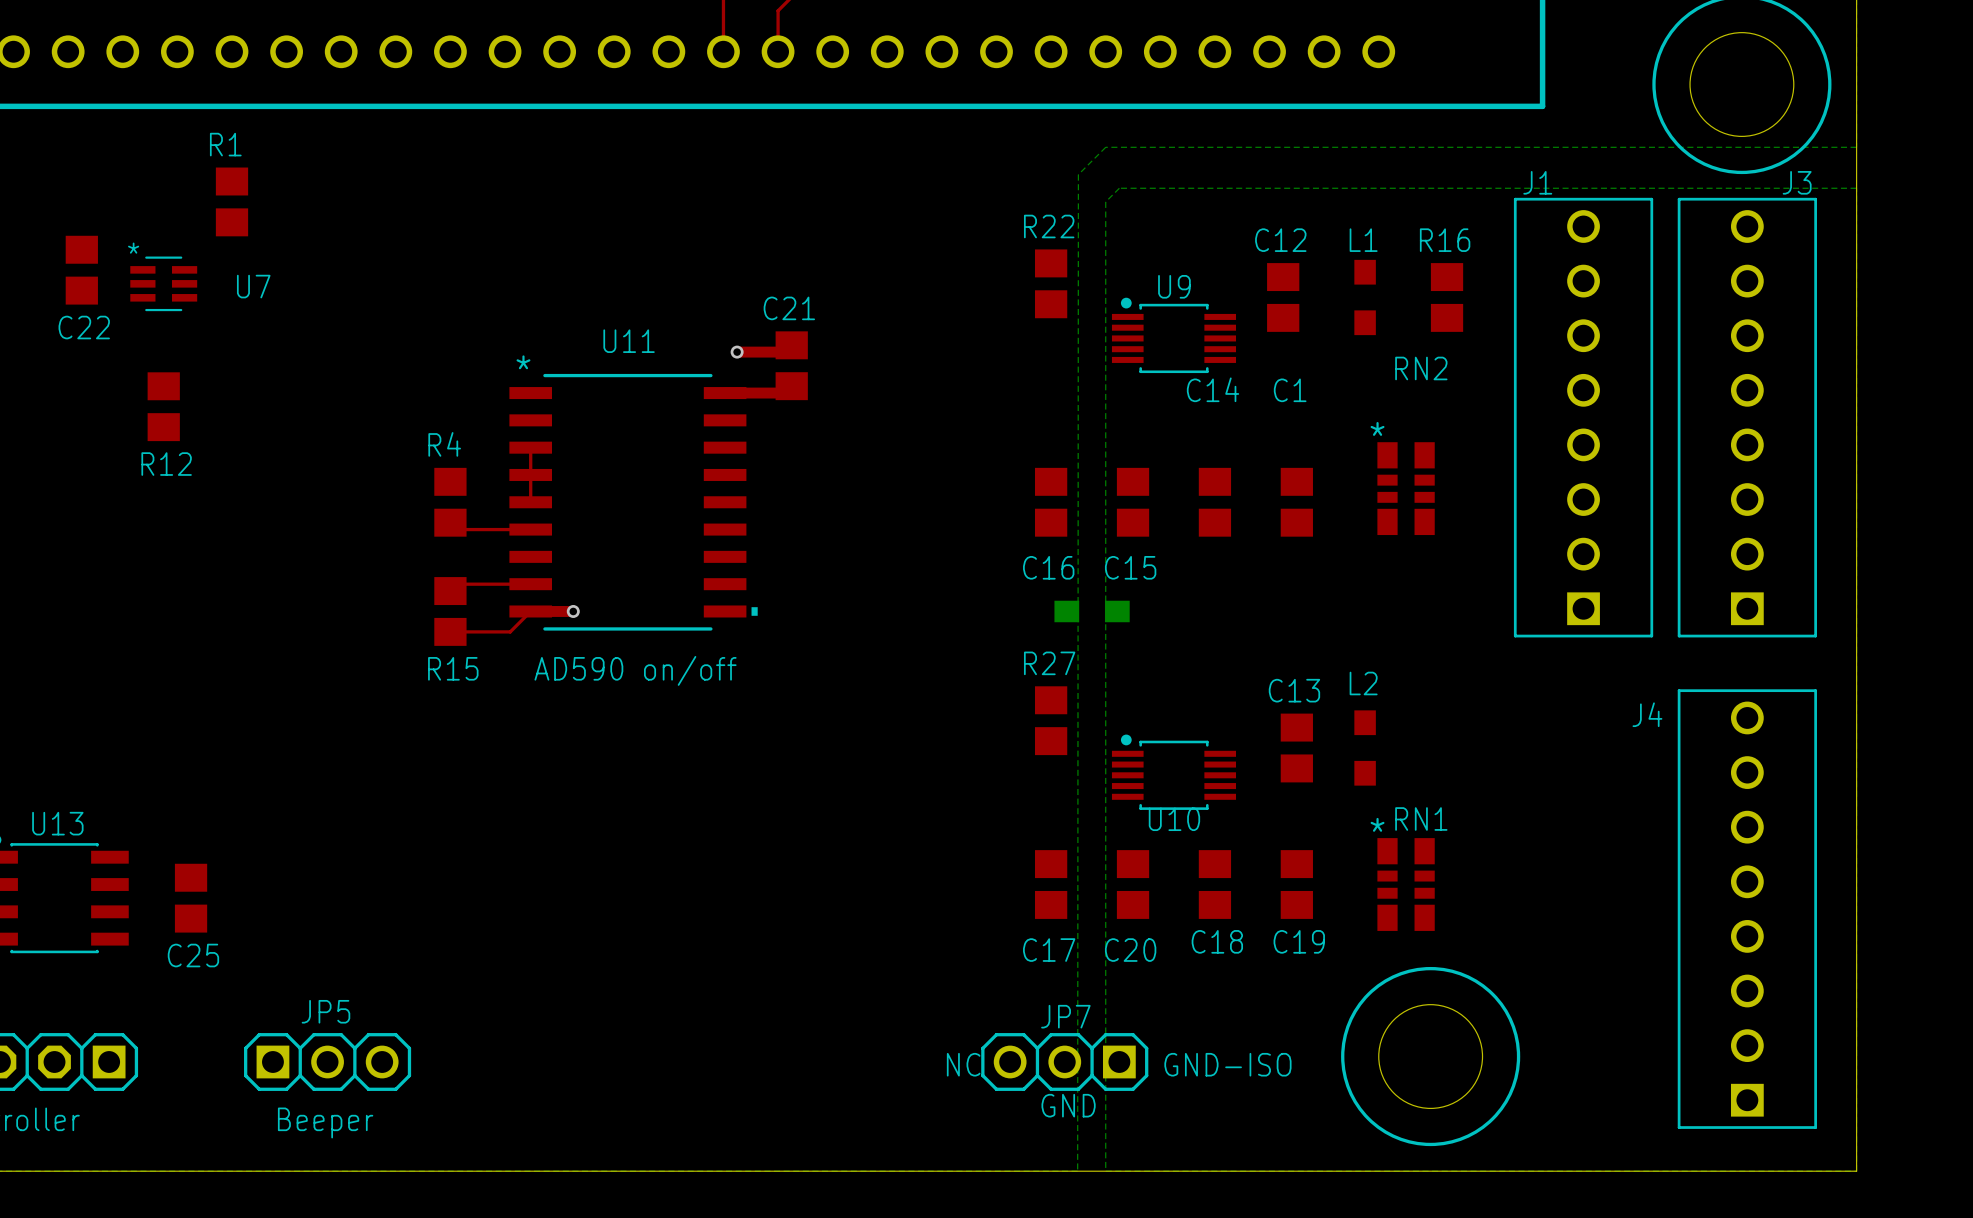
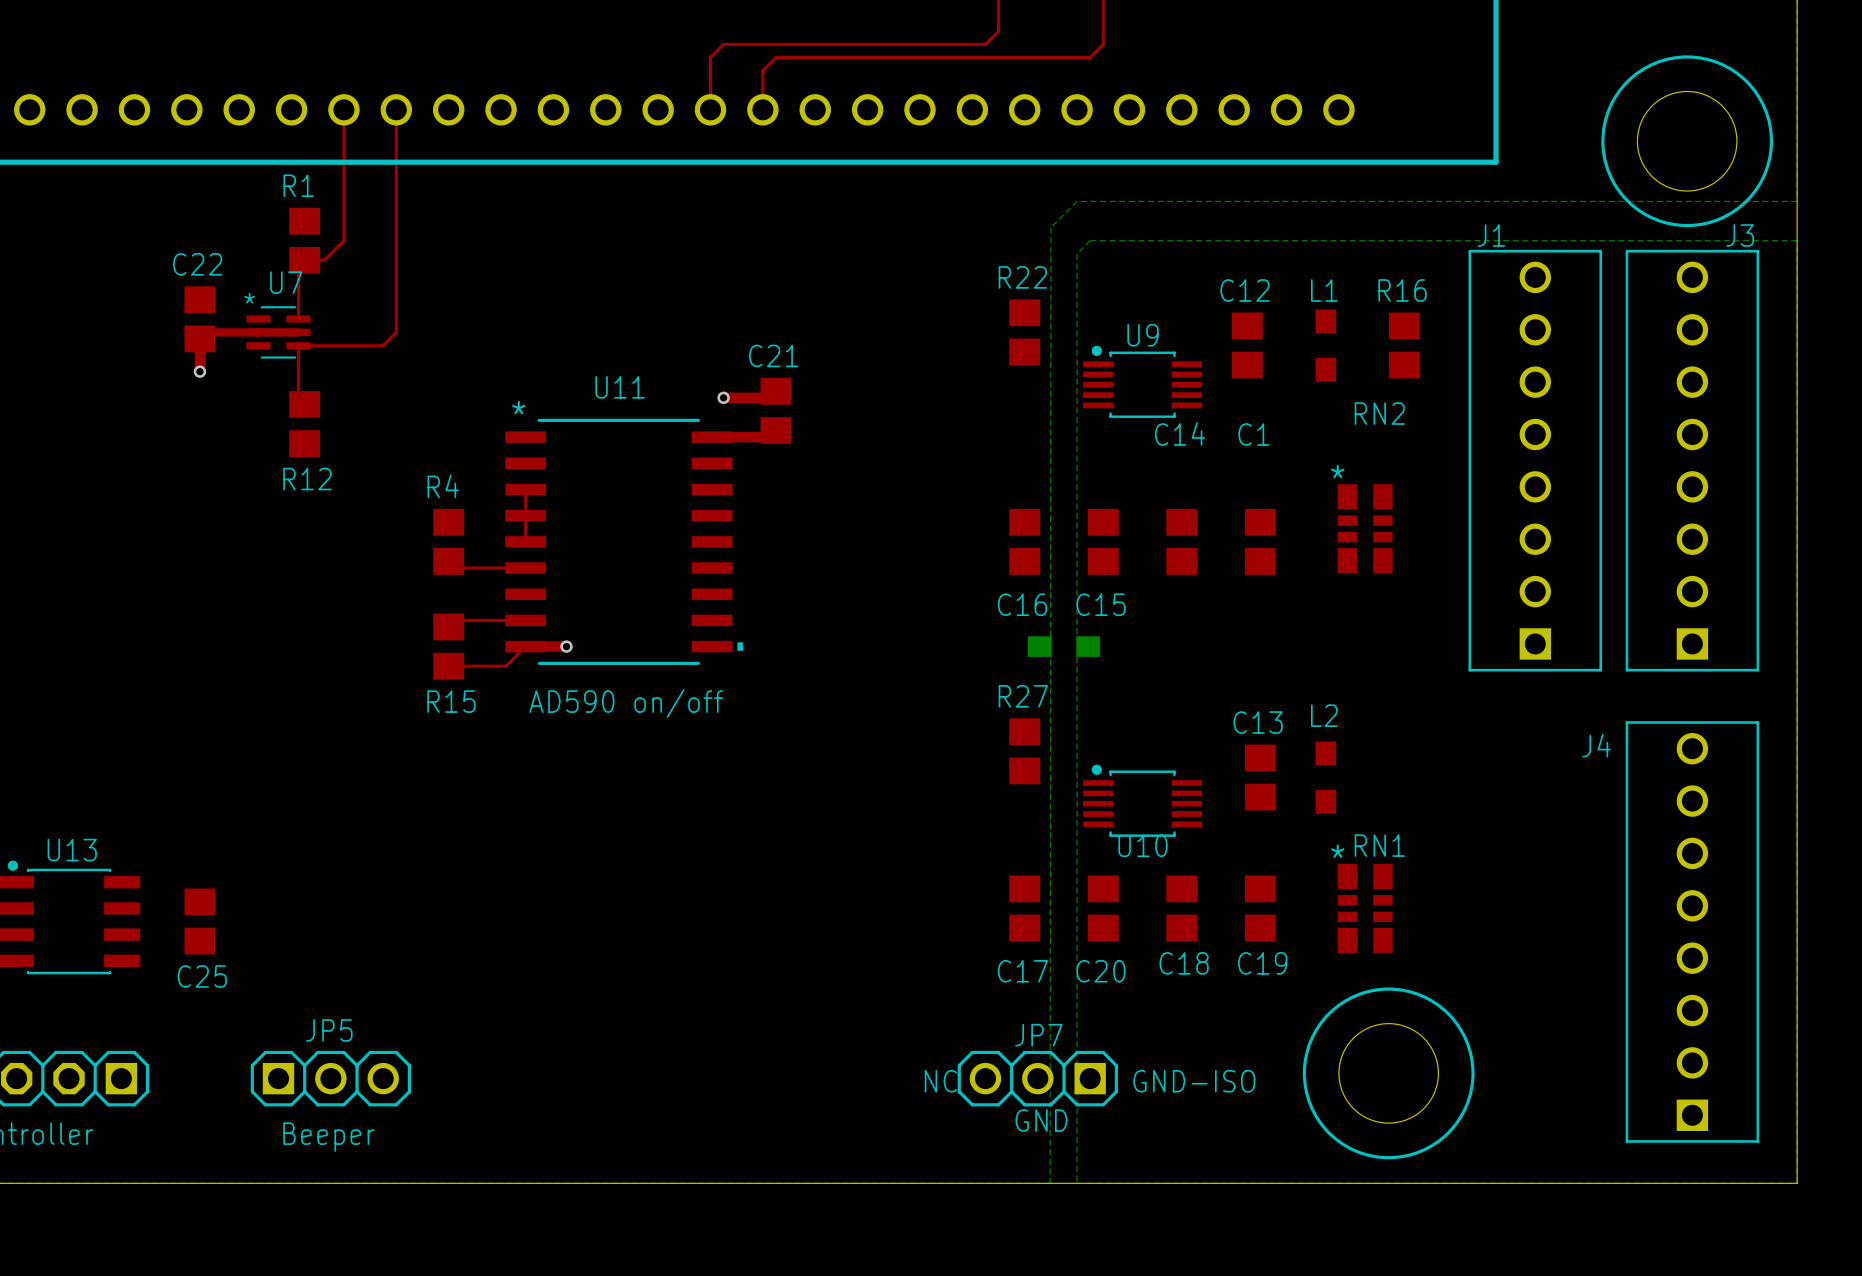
top track: none -> (343, 109) (343, 240) (324, 260) (304, 260) (298, 266) (298, 318)
top track: none -> (396, 109) (396, 332) (382, 345) (298, 345) (298, 398) (304, 404)
R1 position: (232, 201) -> (304, 240)
C22 position: (81, 270) -> (199, 319)
U7 position: (163, 283) -> (278, 332)
top track: none -> (298, 332) (206, 332) (199, 338) (199, 371)
U7 name position: U7 (253, 286) -> U7 (286, 282)
via: none -> (199, 371)
C22 name position: C22 (84, 327) -> C22 (197, 264)
R12 position: (163, 406) -> (304, 424)

